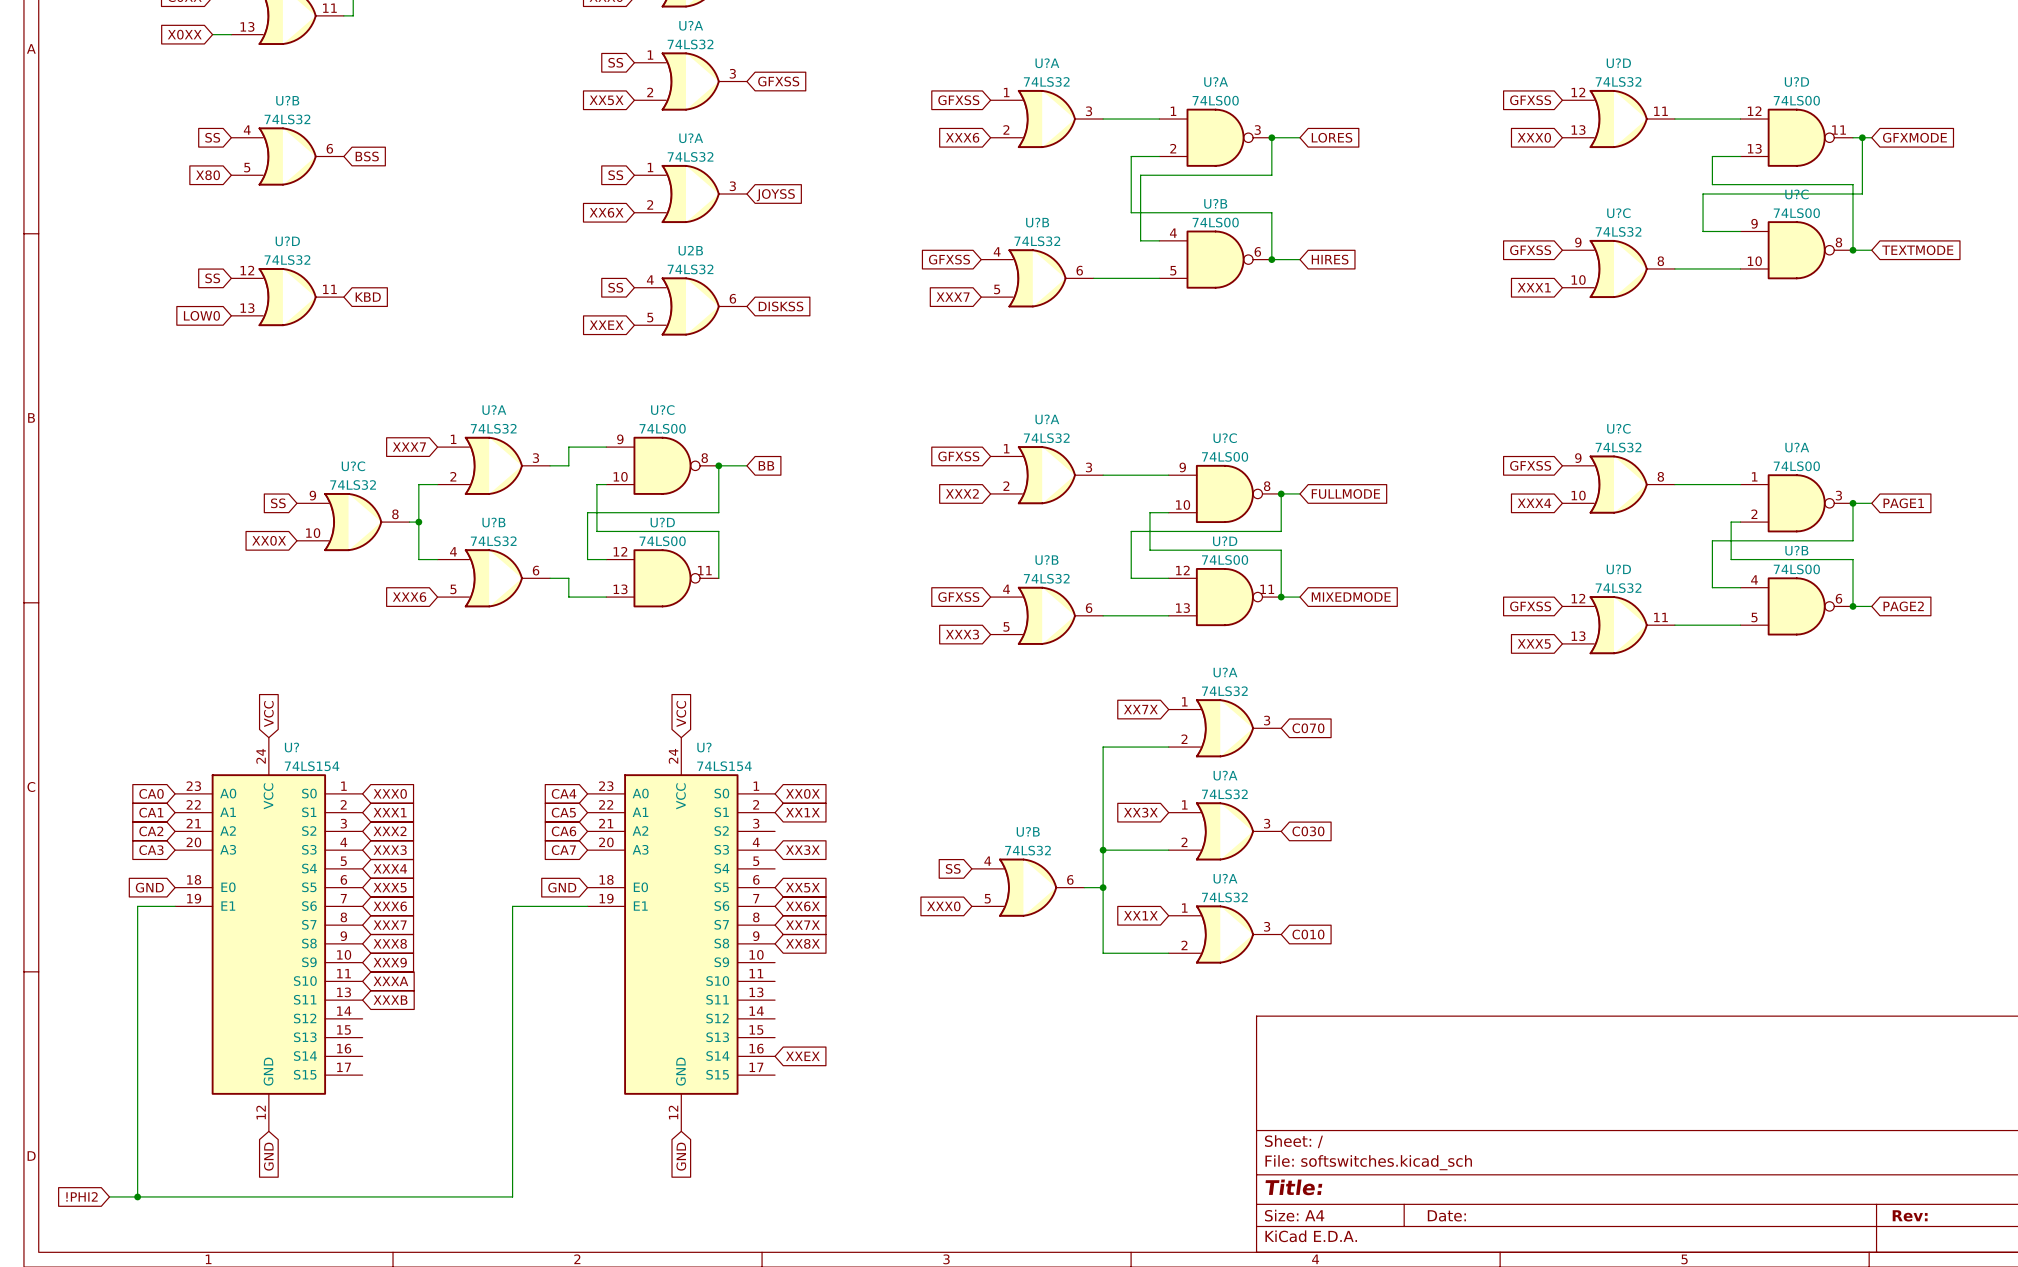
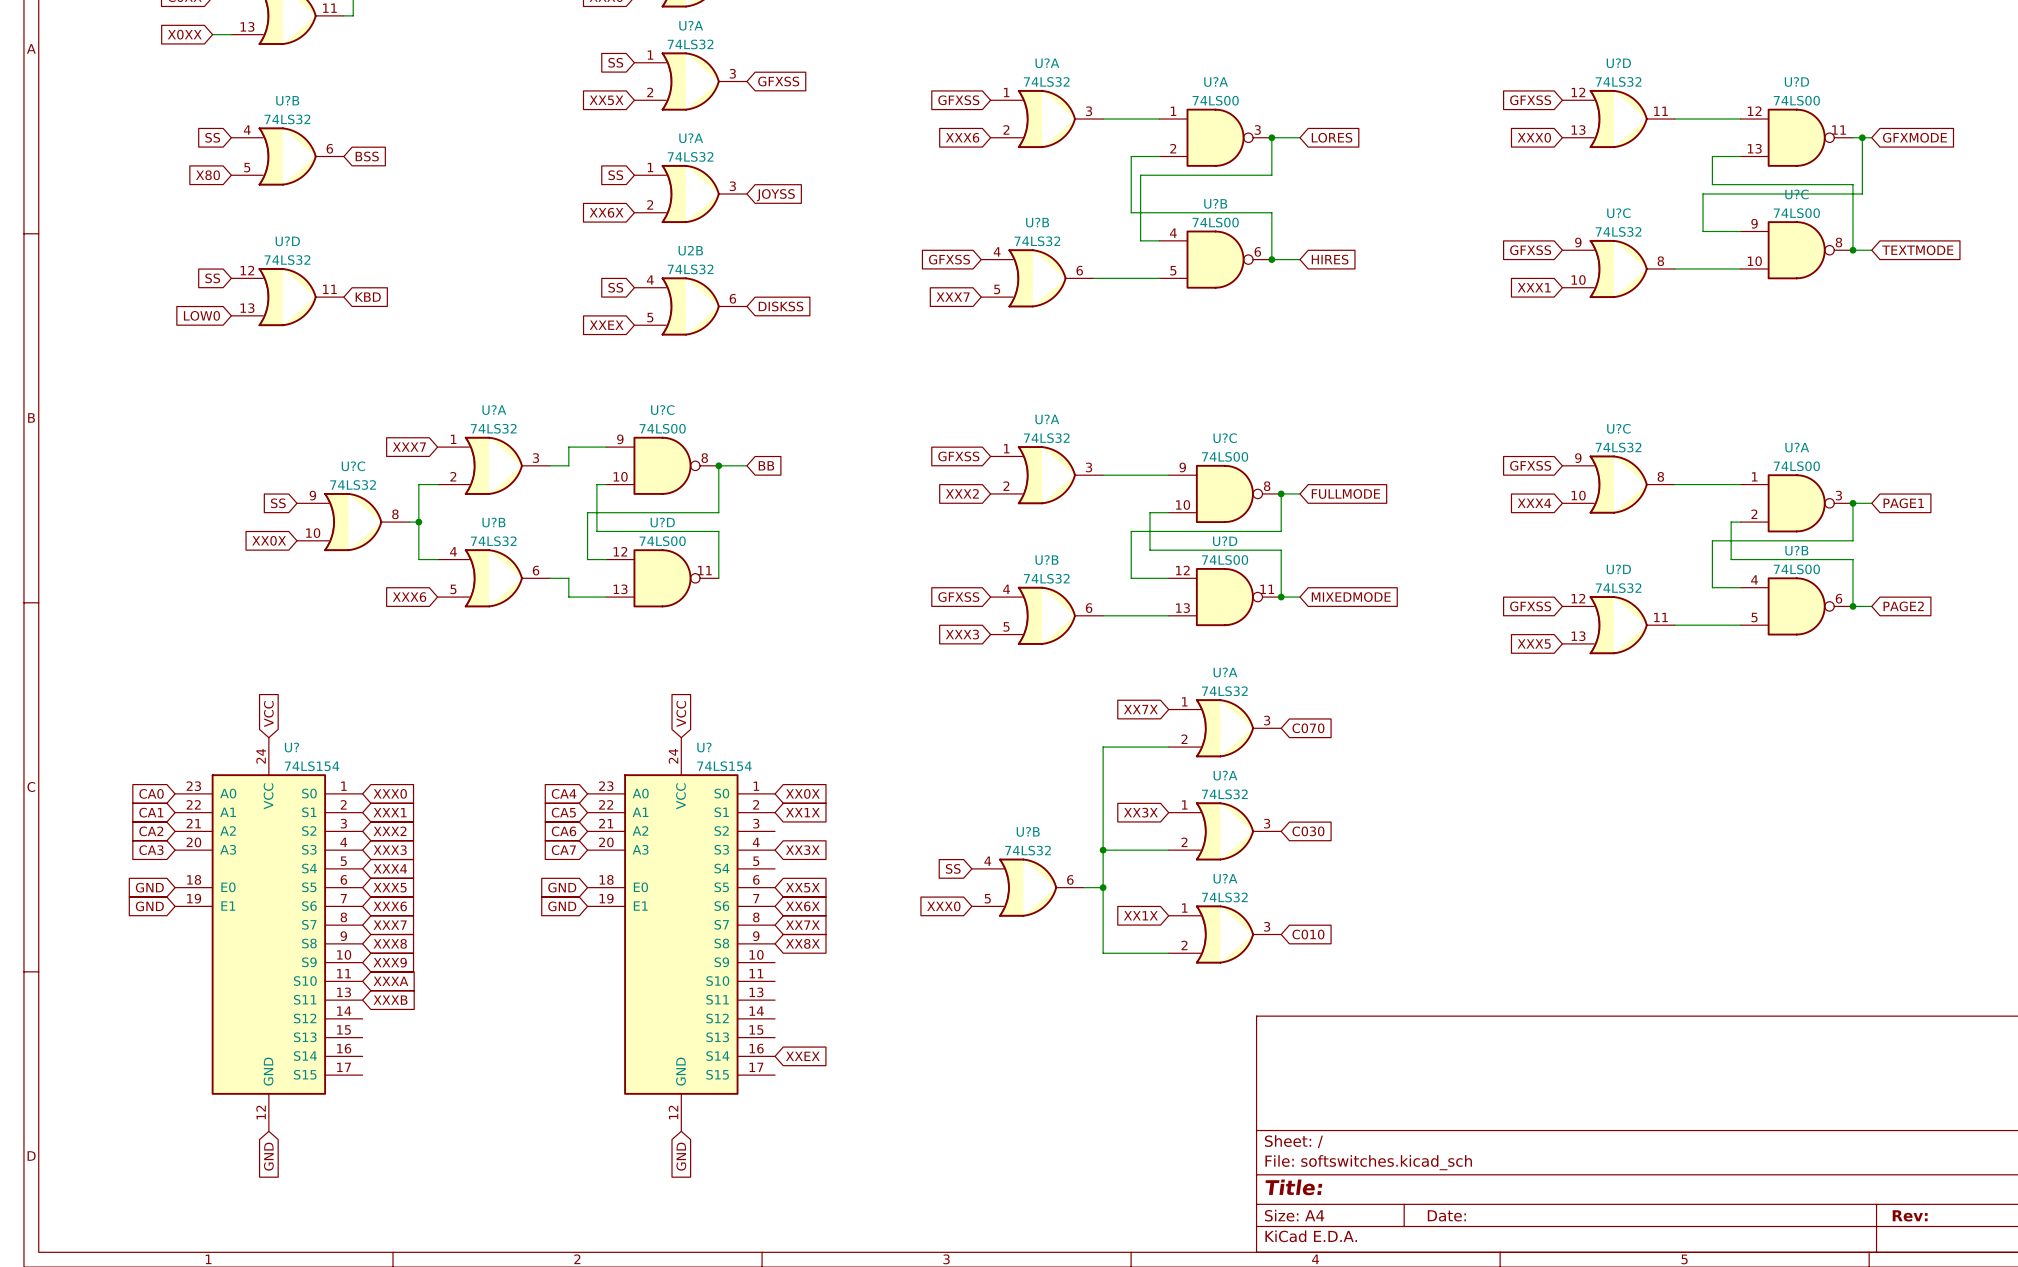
global label: none -> GND (149, 906)
wire: (175, 906) (137, 906) (137, 1196) -> none
global label: none -> GND (562, 906)
wire: (587, 906) (512, 906) (512, 1196) (109, 1196) -> none
global label: !PHI2 (82, 1196) -> none
junction: (137, 1196) -> none

